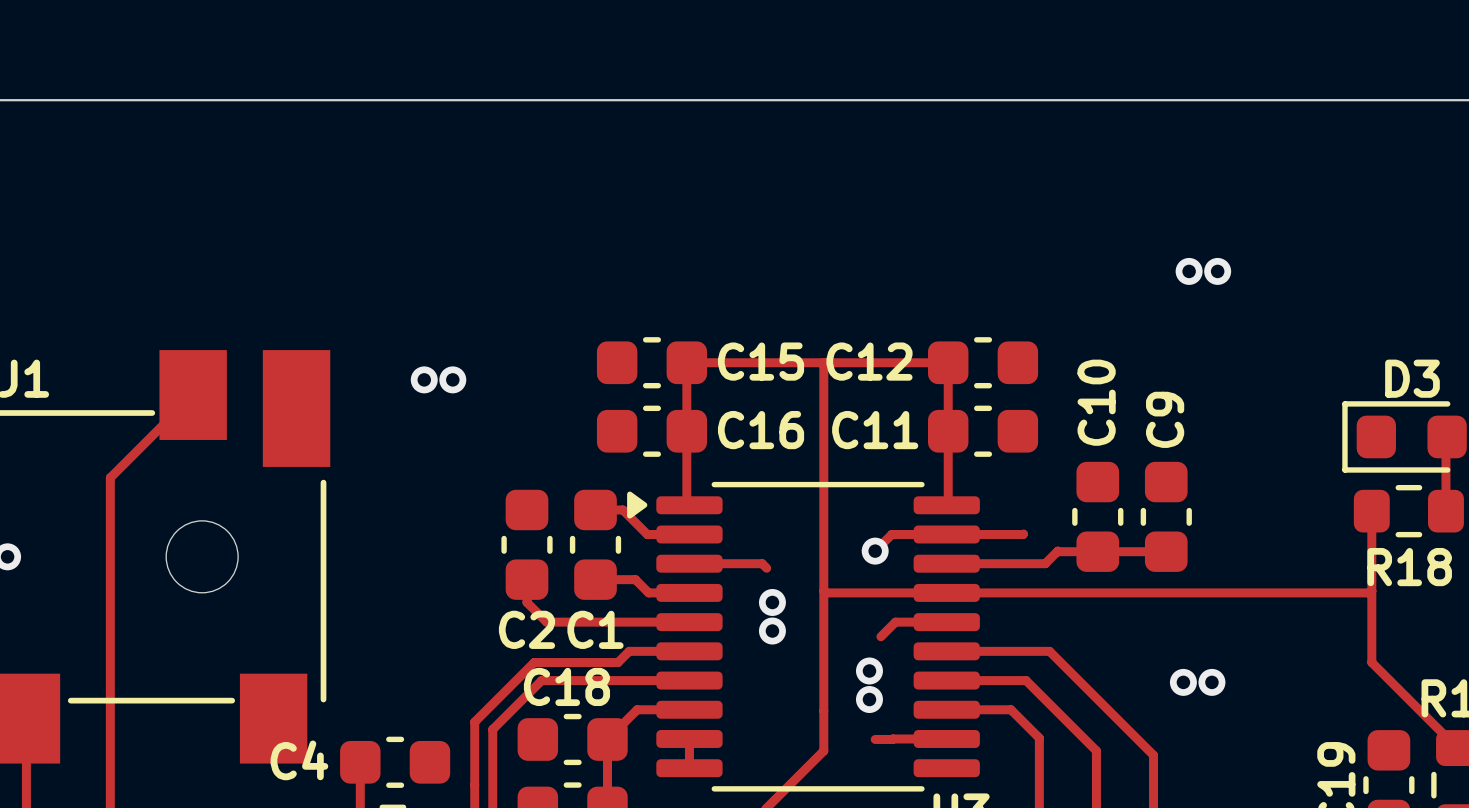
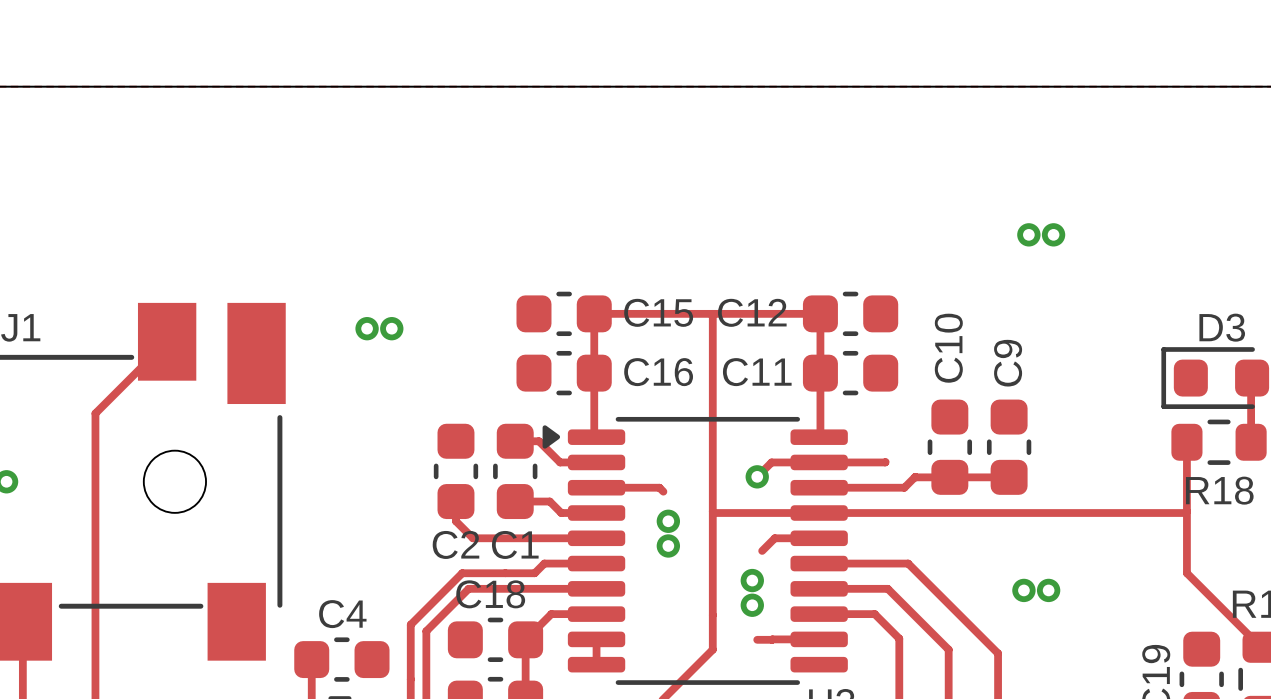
C4 name position: C4 (299, 760) -> C4 (342, 614)

